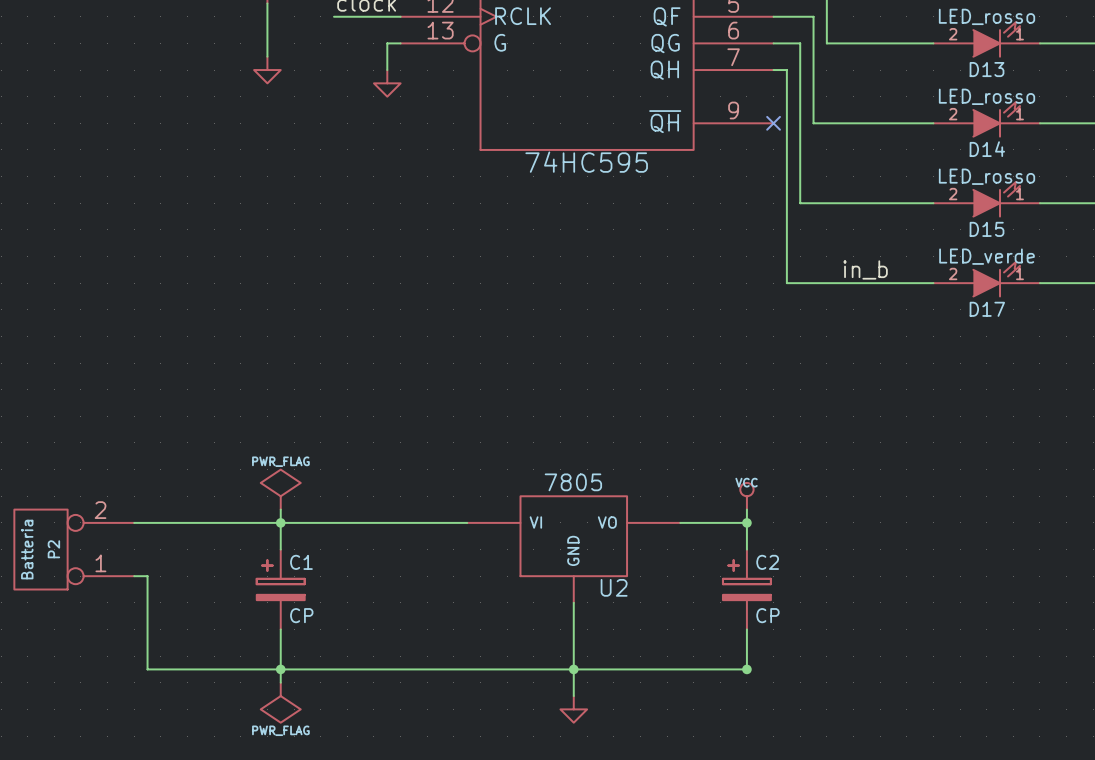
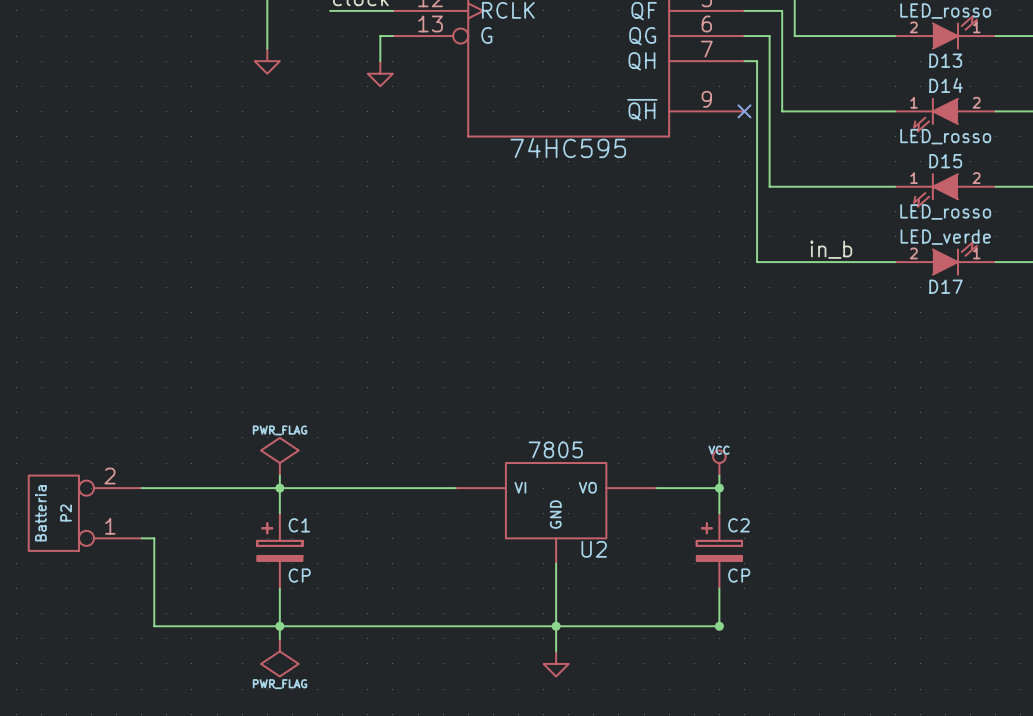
D14 rotation: 0° (996, 119) -> 180° (936, 115)
D15 rotation: 0° (996, 199) -> 180° (936, 190)

